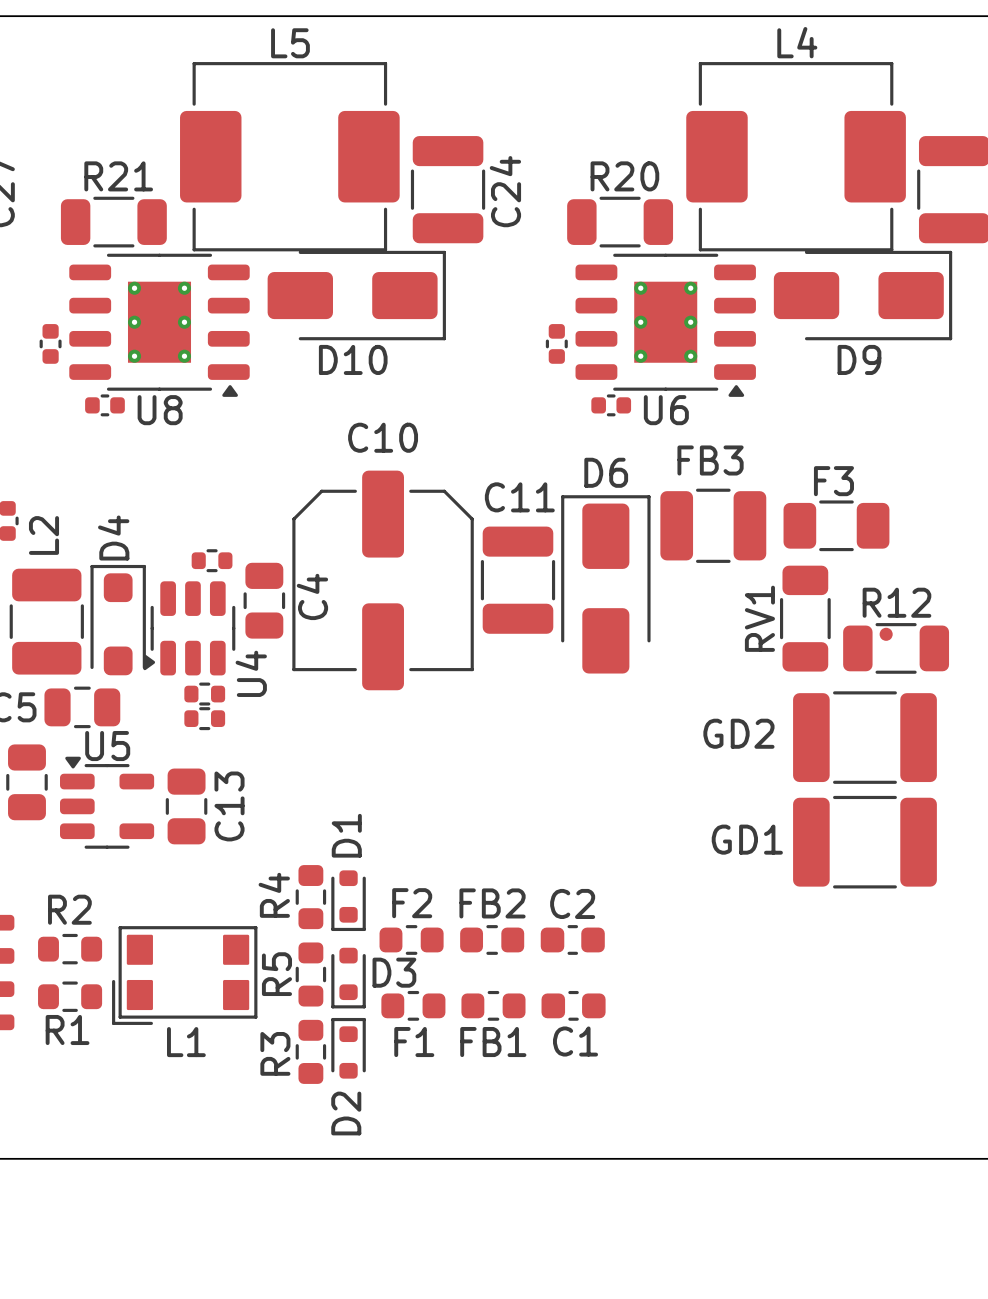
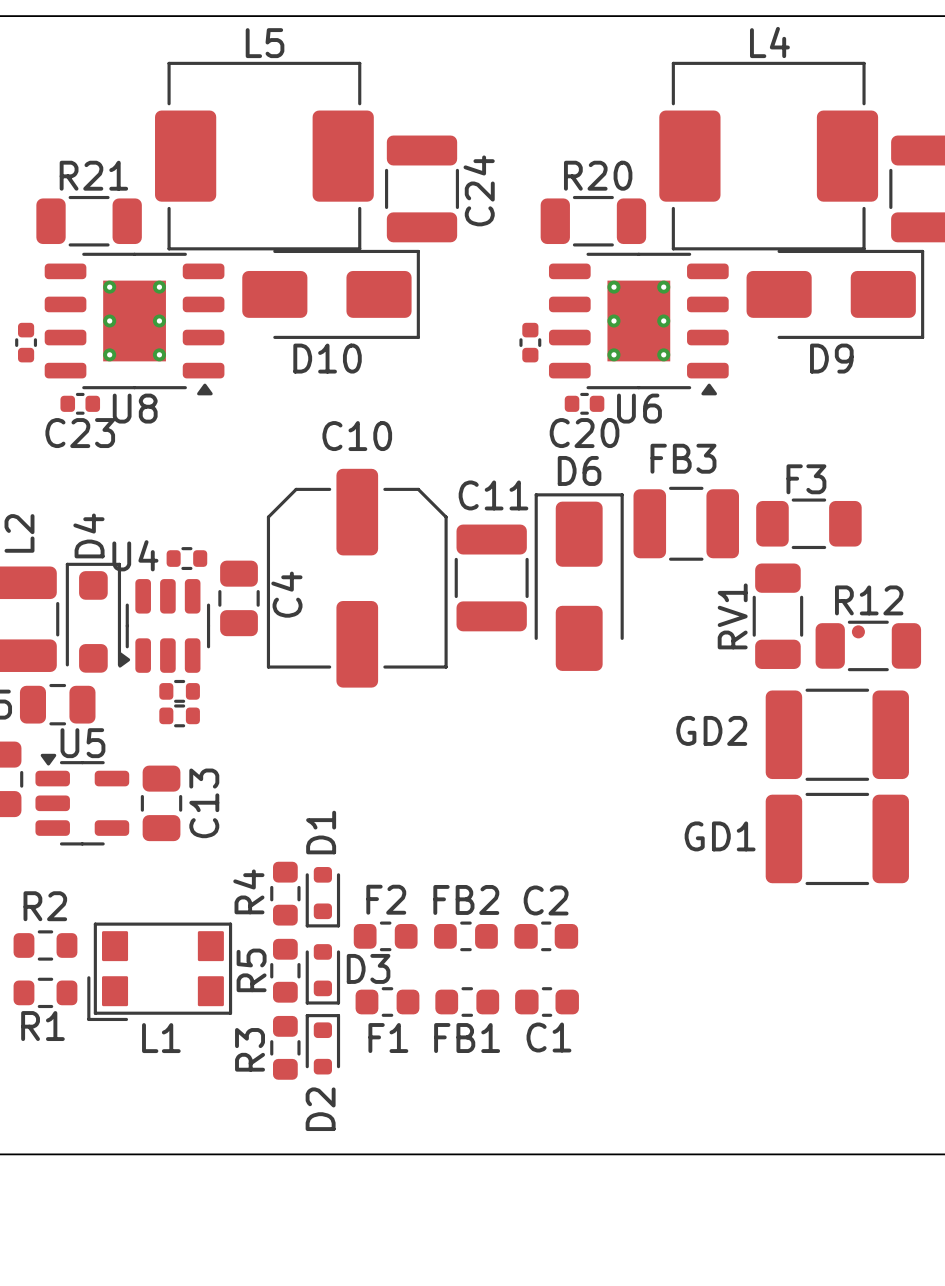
C23 name: none -> C23 (80, 433)
C20 name: none -> C20 (584, 433)
U4 name rotation: 0° (251, 673) -> 90° clockwise (135, 555)
U4 name position: U4 (251, 673) -> U4 (135, 555)

